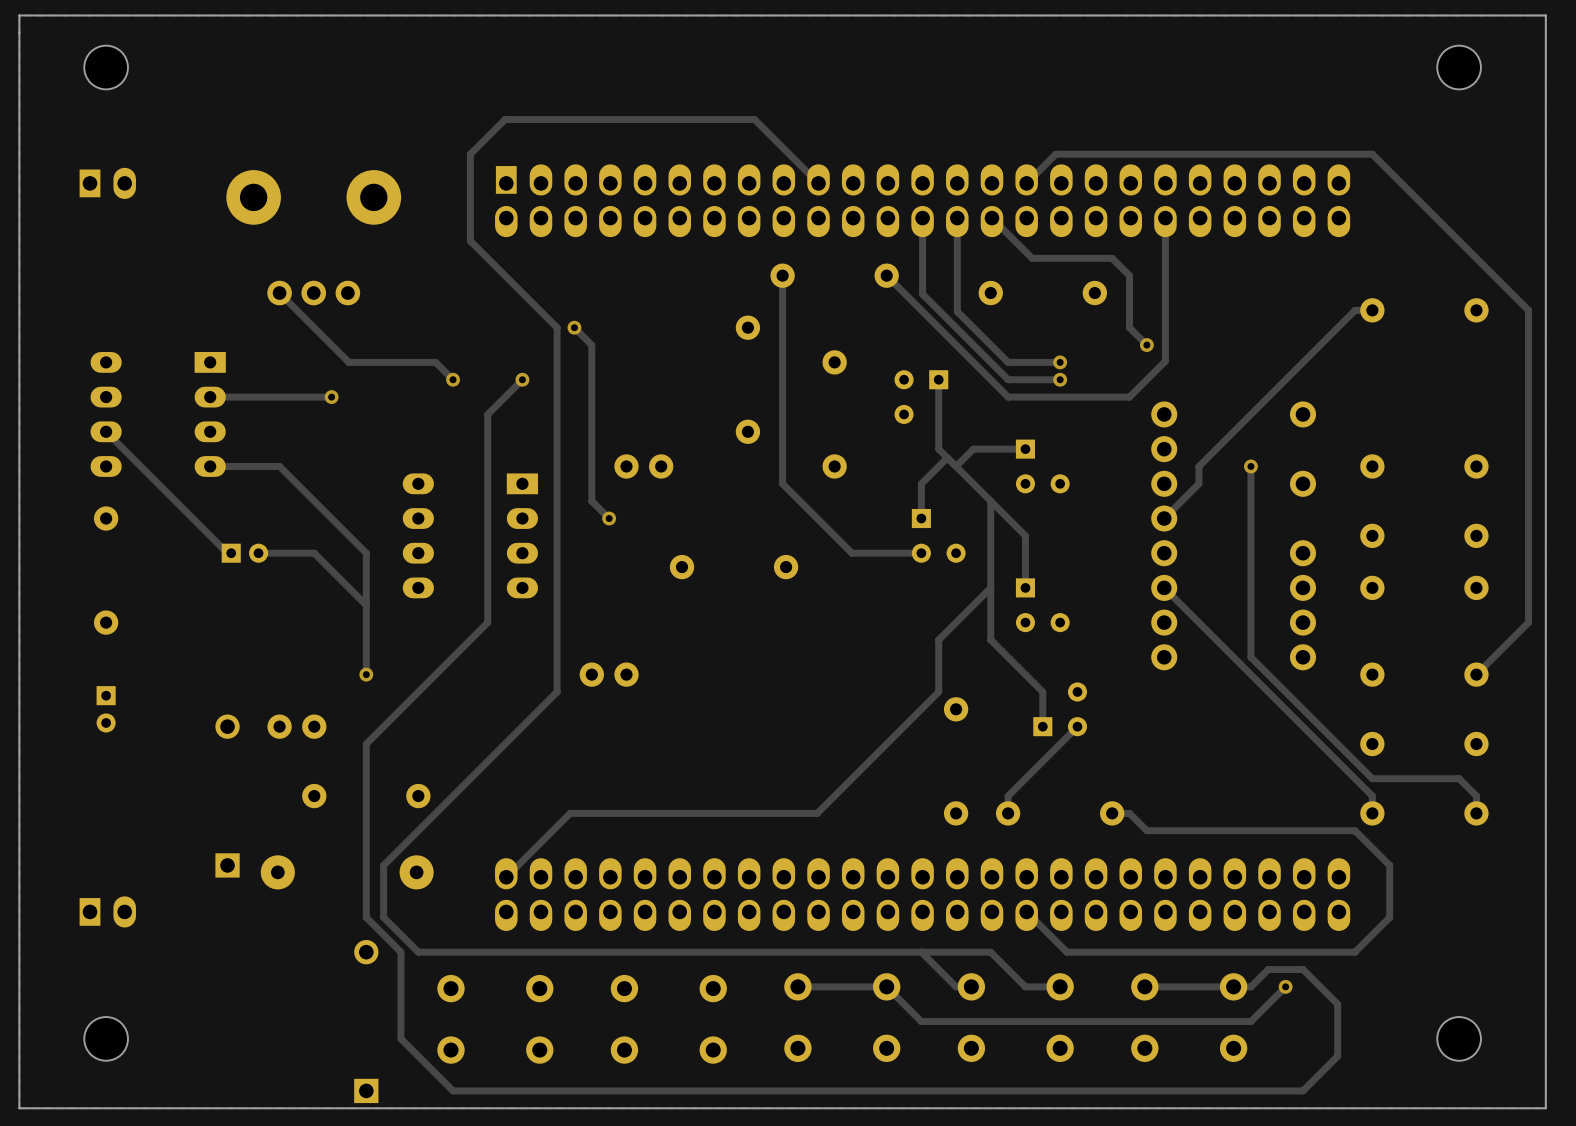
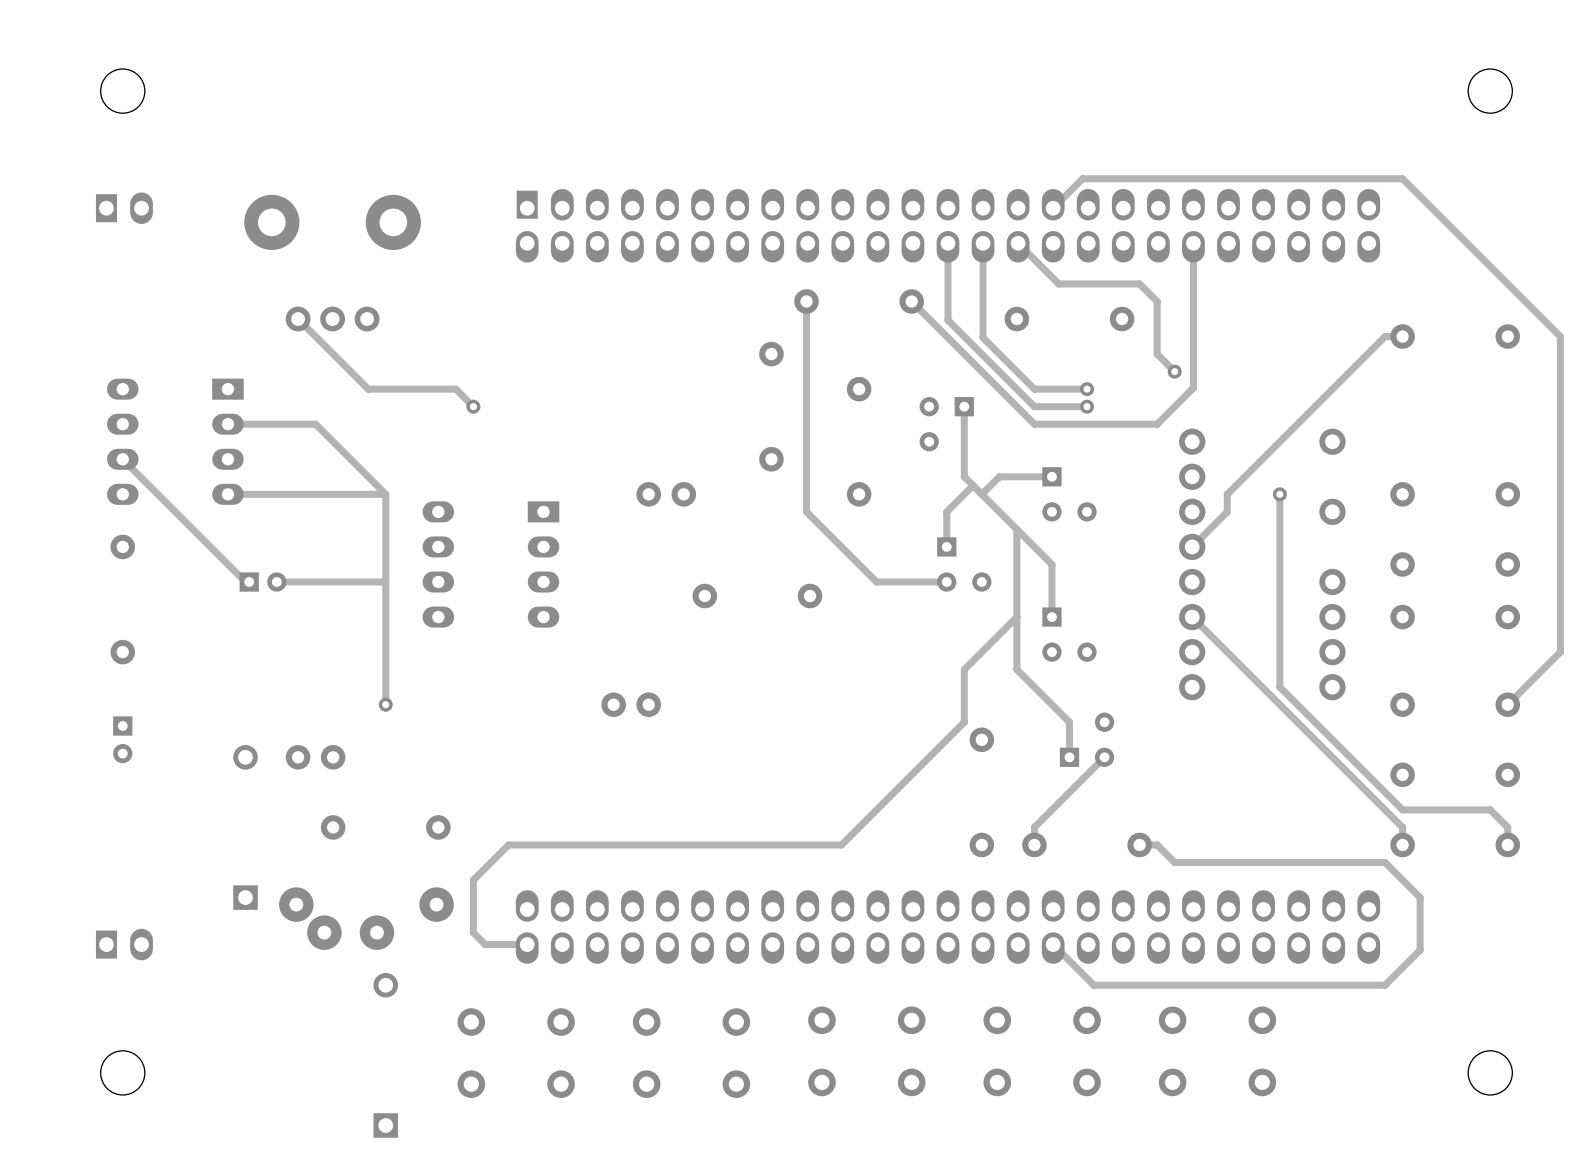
board edge: (1545, 15) (19, 15) (19, 1108) (1545, 1108) (1545, 15) -> none
track: (818, 183) (754, 119) (505, 119) (470, 154) (470, 240) (557, 327) (557, 691) (383, 865) (383, 917) (418, 952) (990, 952) (1025, 986) (1060, 986) -> none
track: (574, 327) (591, 345) (591, 501) (609, 518) -> none
via: (574, 327) -> none
track: (522, 379) (487, 414) (487, 622) (366, 744) (366, 917) (401, 952) (401, 1038) (453, 1090) (1302, 1090) (1337, 1056) (1337, 1004) (1302, 969) (1268, 969) (1250, 986) (1144, 986) -> none
via: (522, 379) -> none
track: (331, 397) (296, 397) -> (385, 494) (315, 424)
via: (331, 397) -> none
track: (279, 466) (366, 553) -> (298, 494) (385, 494)
via: (609, 518) -> none
track: (314, 553) (366, 605) -> (333, 582) (385, 582) (385, 494)
track: (570, 813) (506, 877) -> (591, 844) (508, 844) (473, 880) (473, 932) (485, 944) (527, 944)
part: none -> (350, 932)
track: (921, 952) (956, 986) (971, 986) -> none
track: (1285, 986) (1250, 1021) (921, 1021) (886, 986) (797, 986) -> none
via: (1285, 986) -> none

